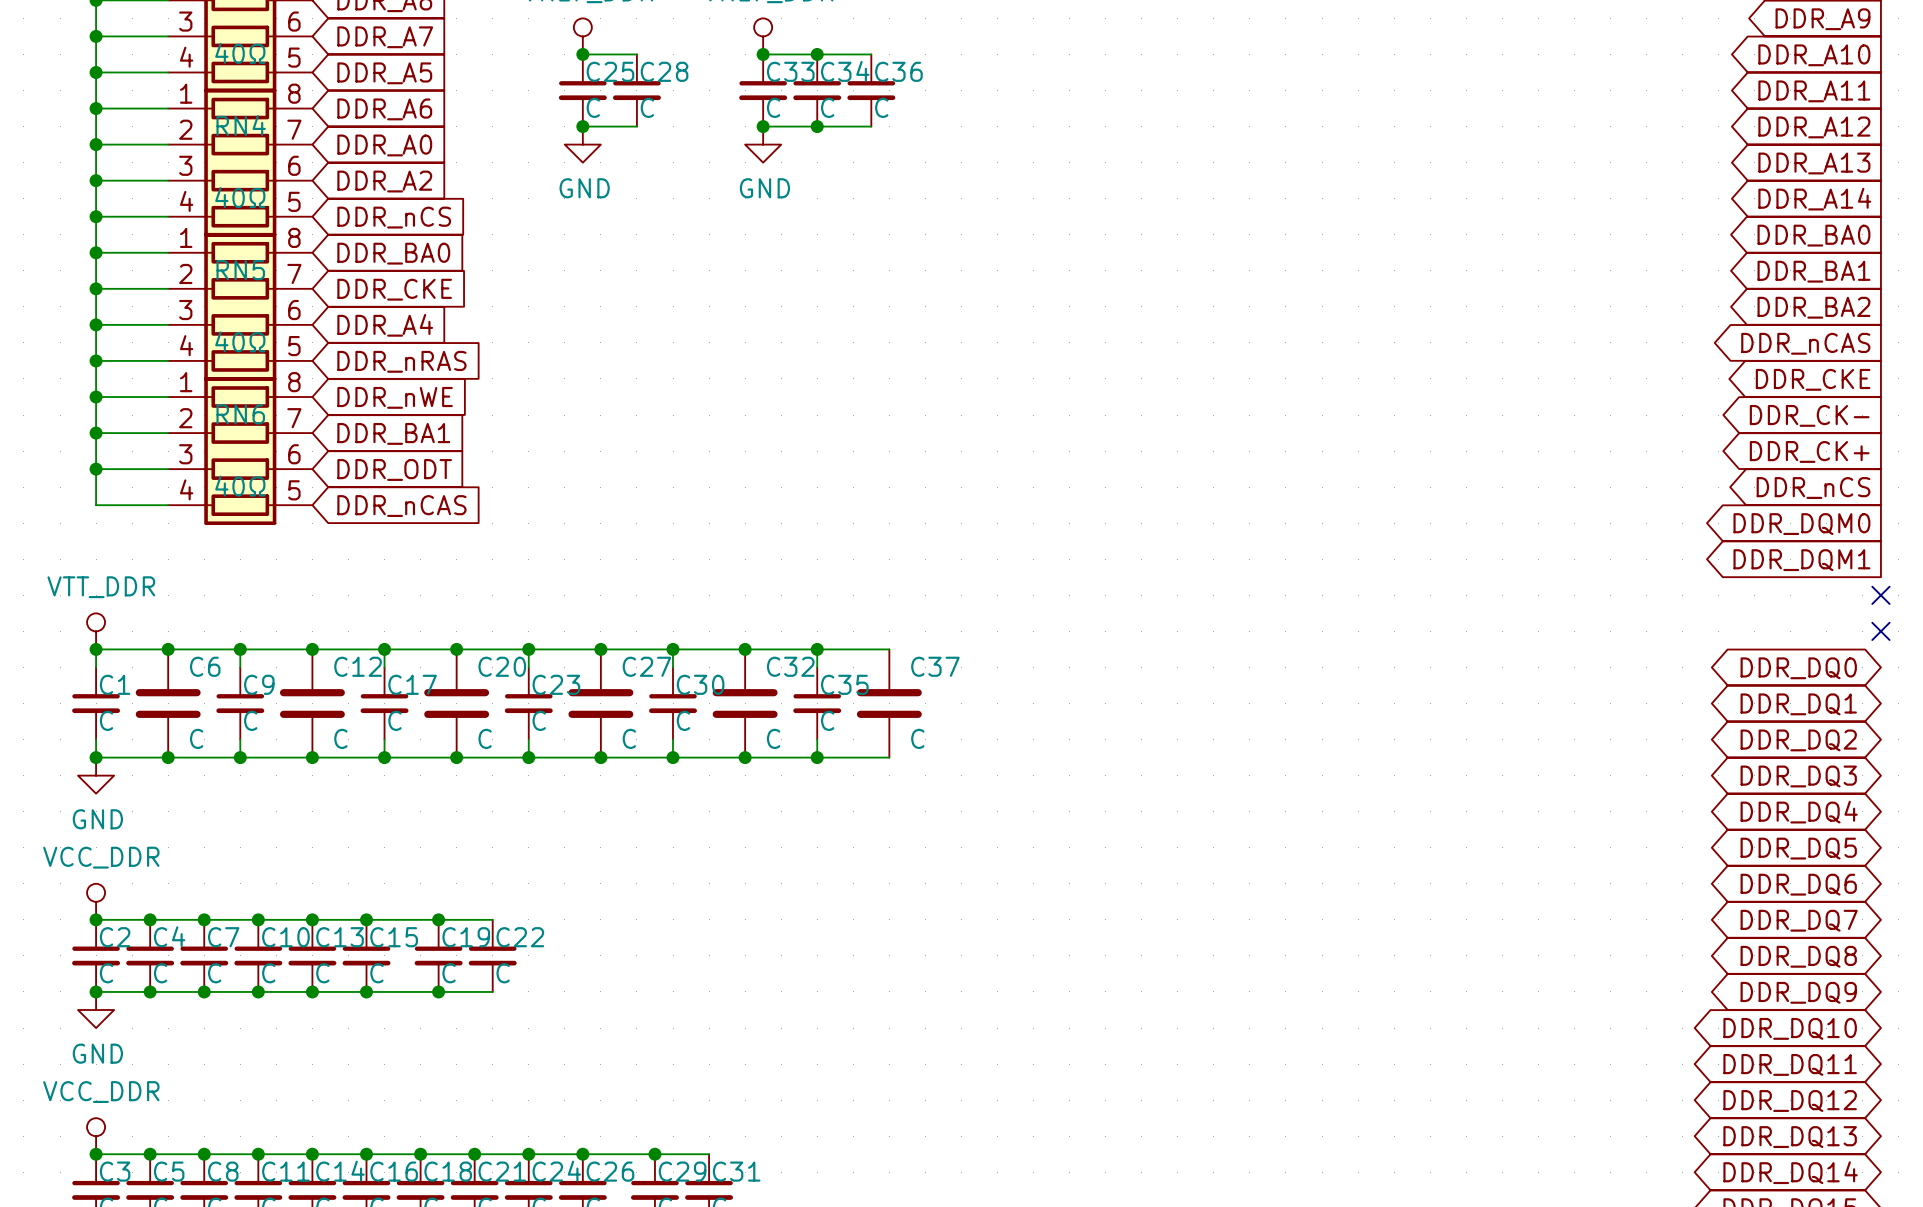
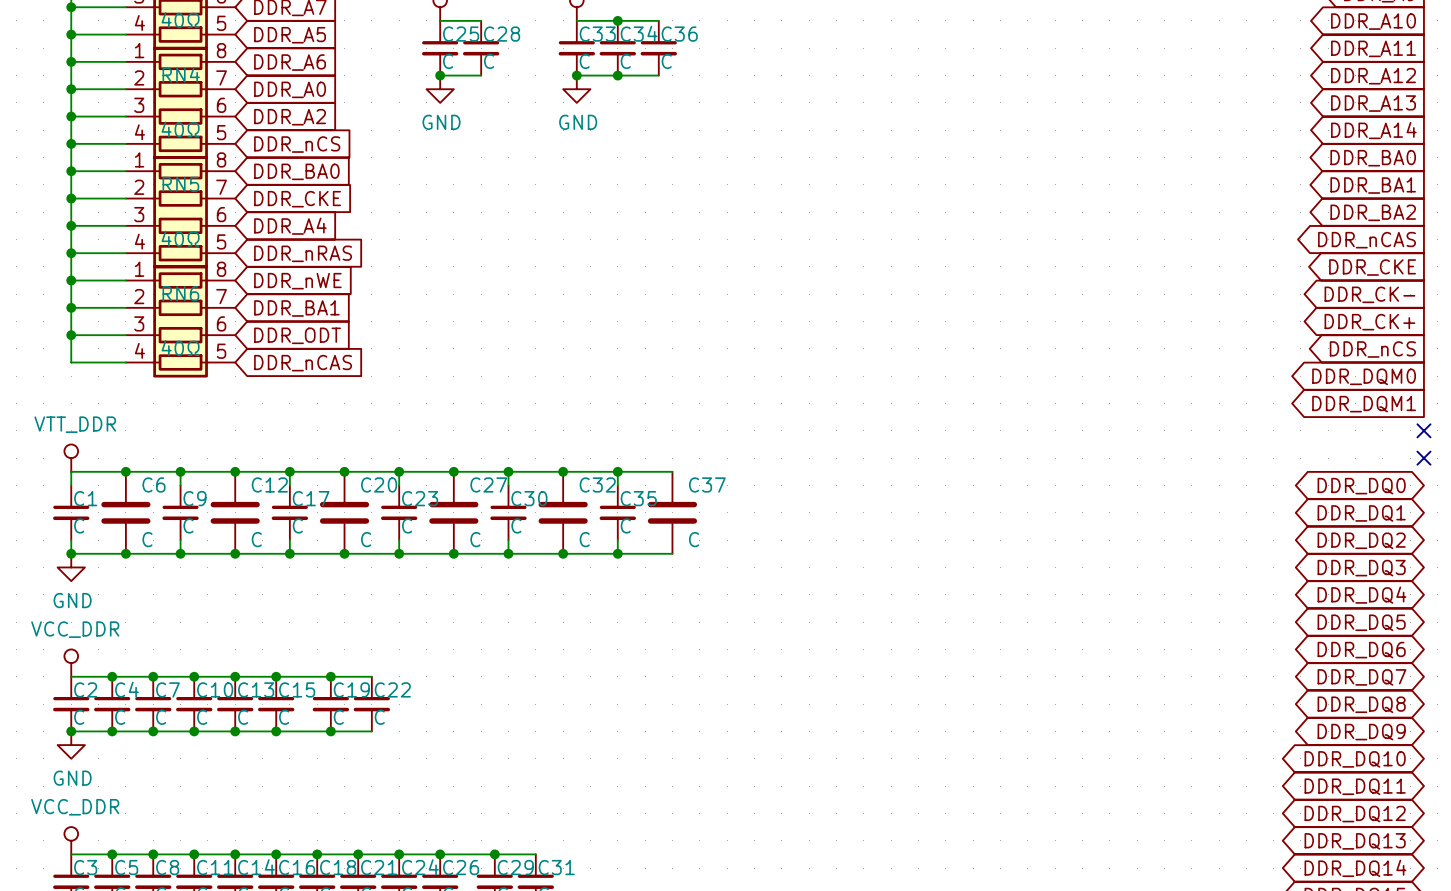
junction: (582, 54) -> none
junction: (763, 54) -> none
junction: (96, 649) -> none
junction: (96, 919) -> none
junction: (96, 1154) -> none

